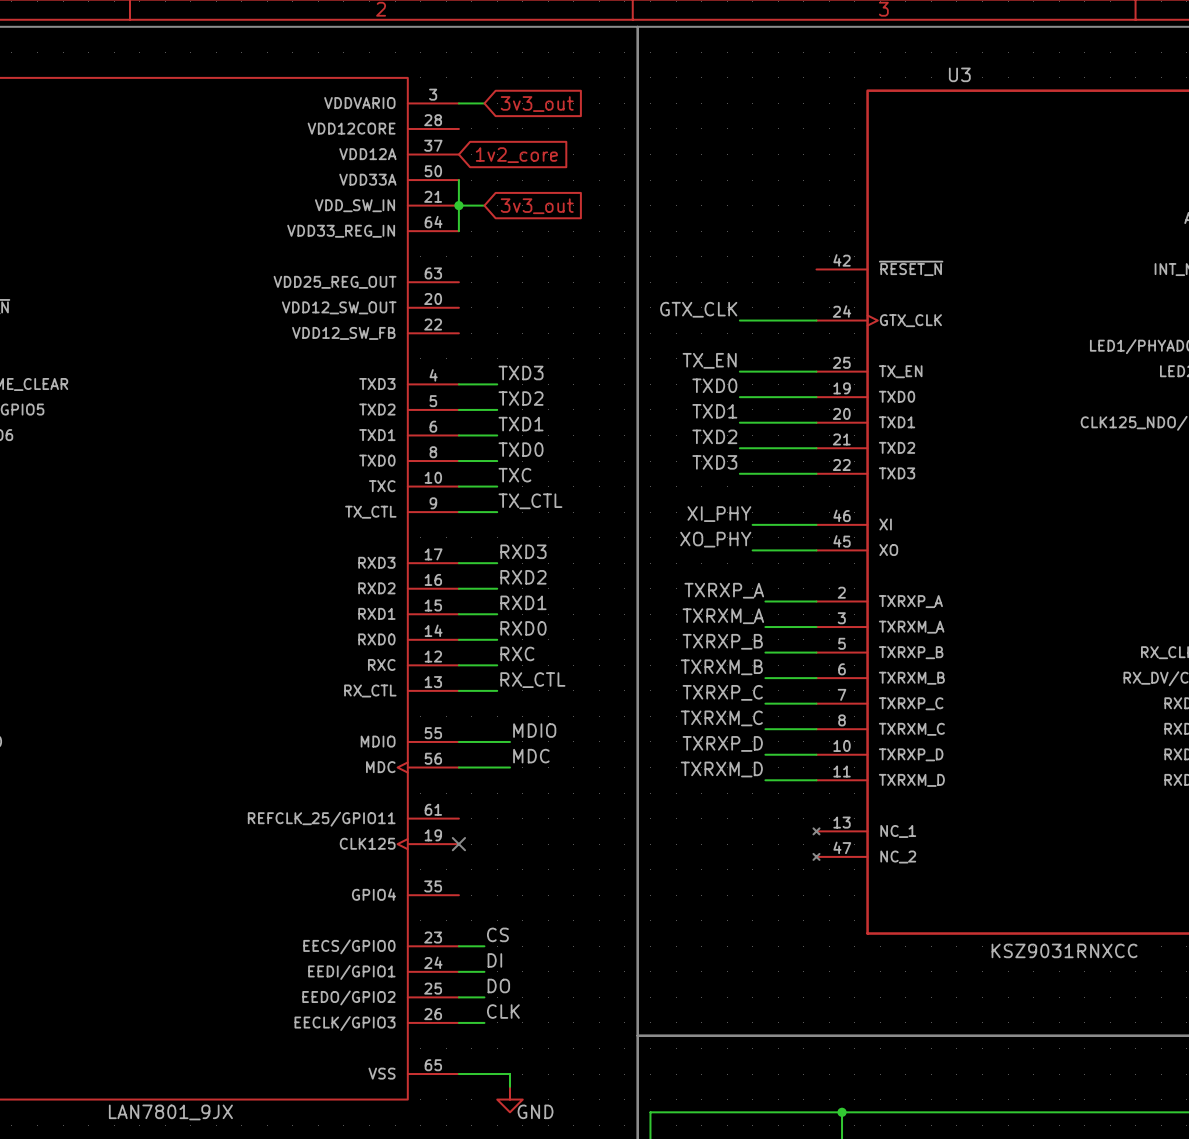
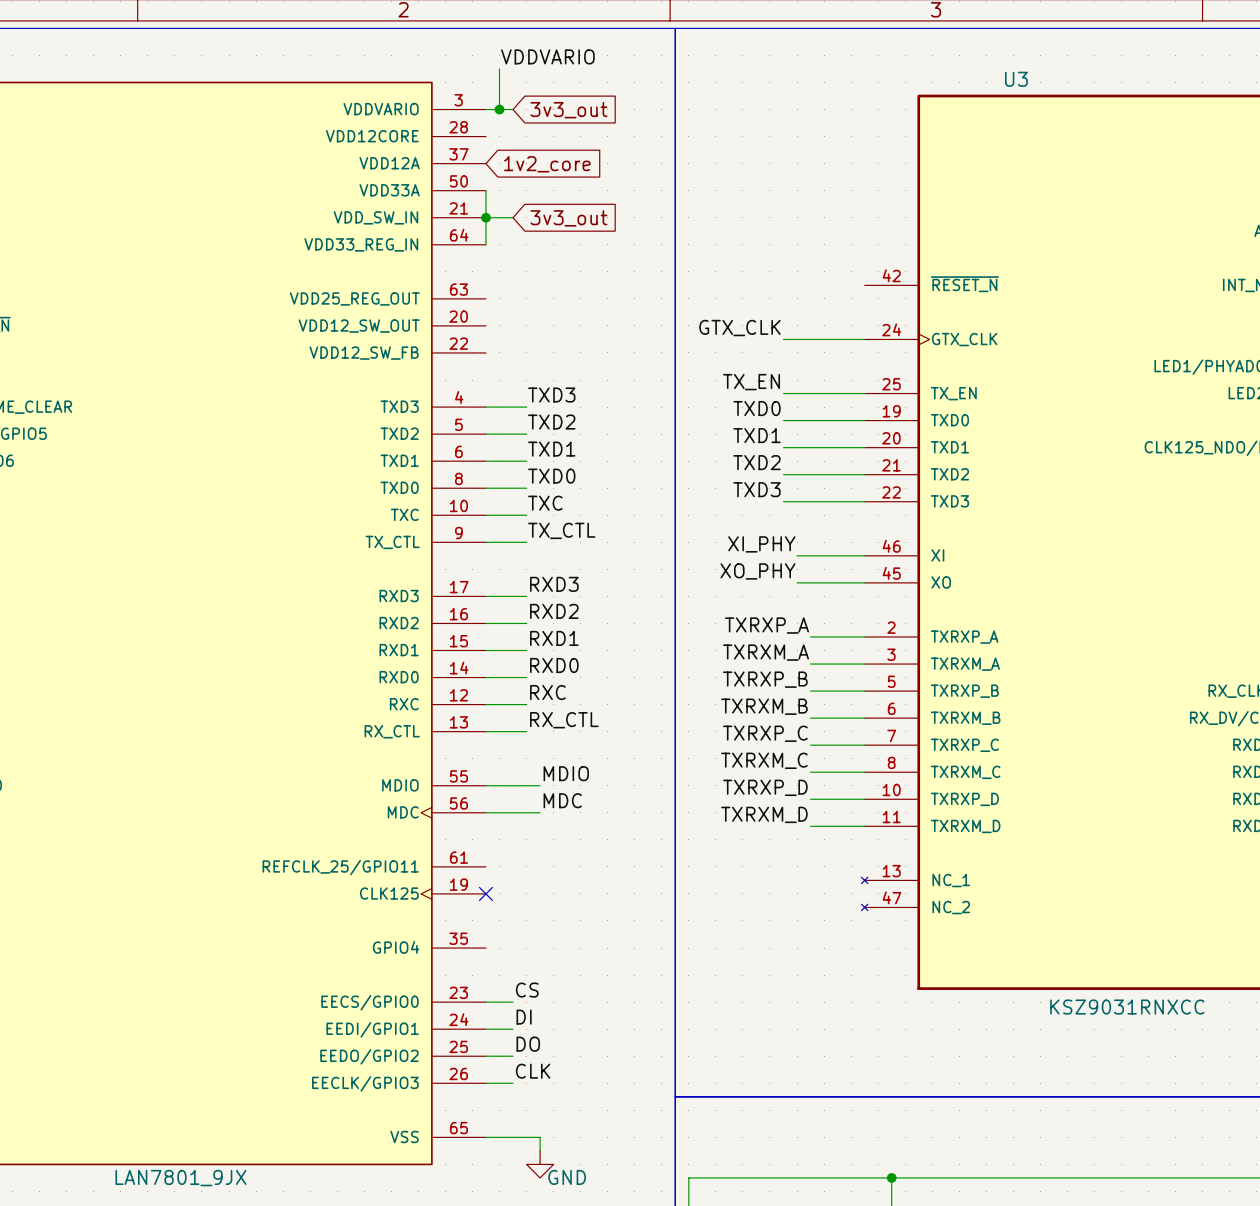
label: none -> VDDVARIO (547, 56)
wire: none -> (499, 68) (499, 109)
junction: none -> (499, 109)

